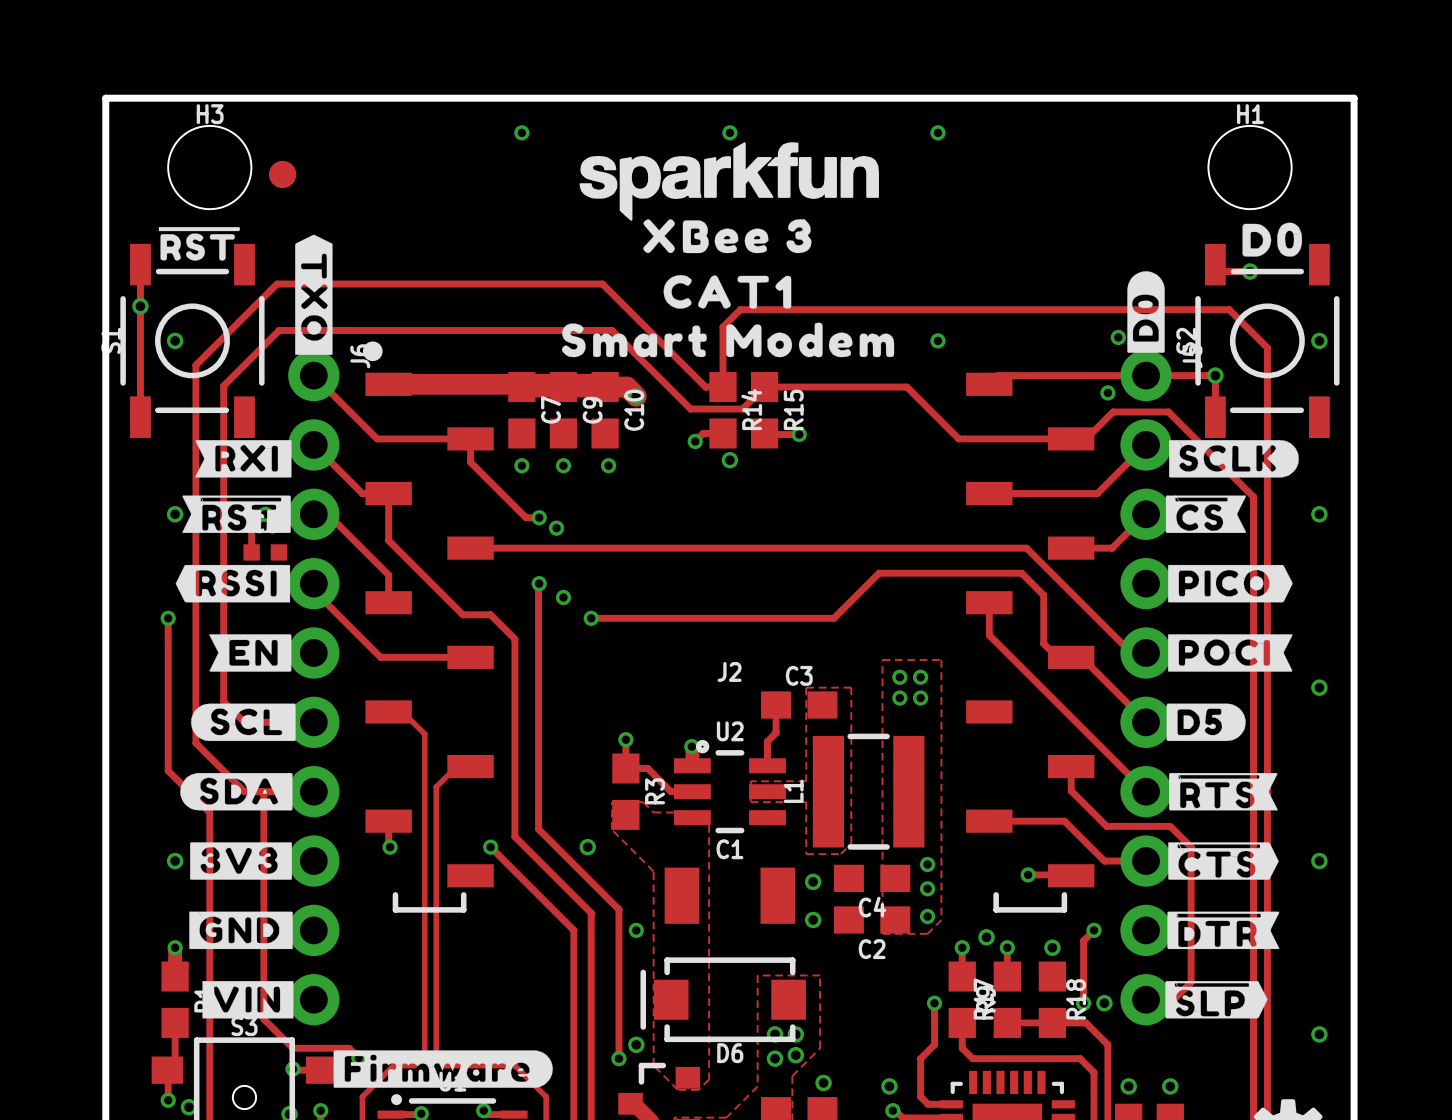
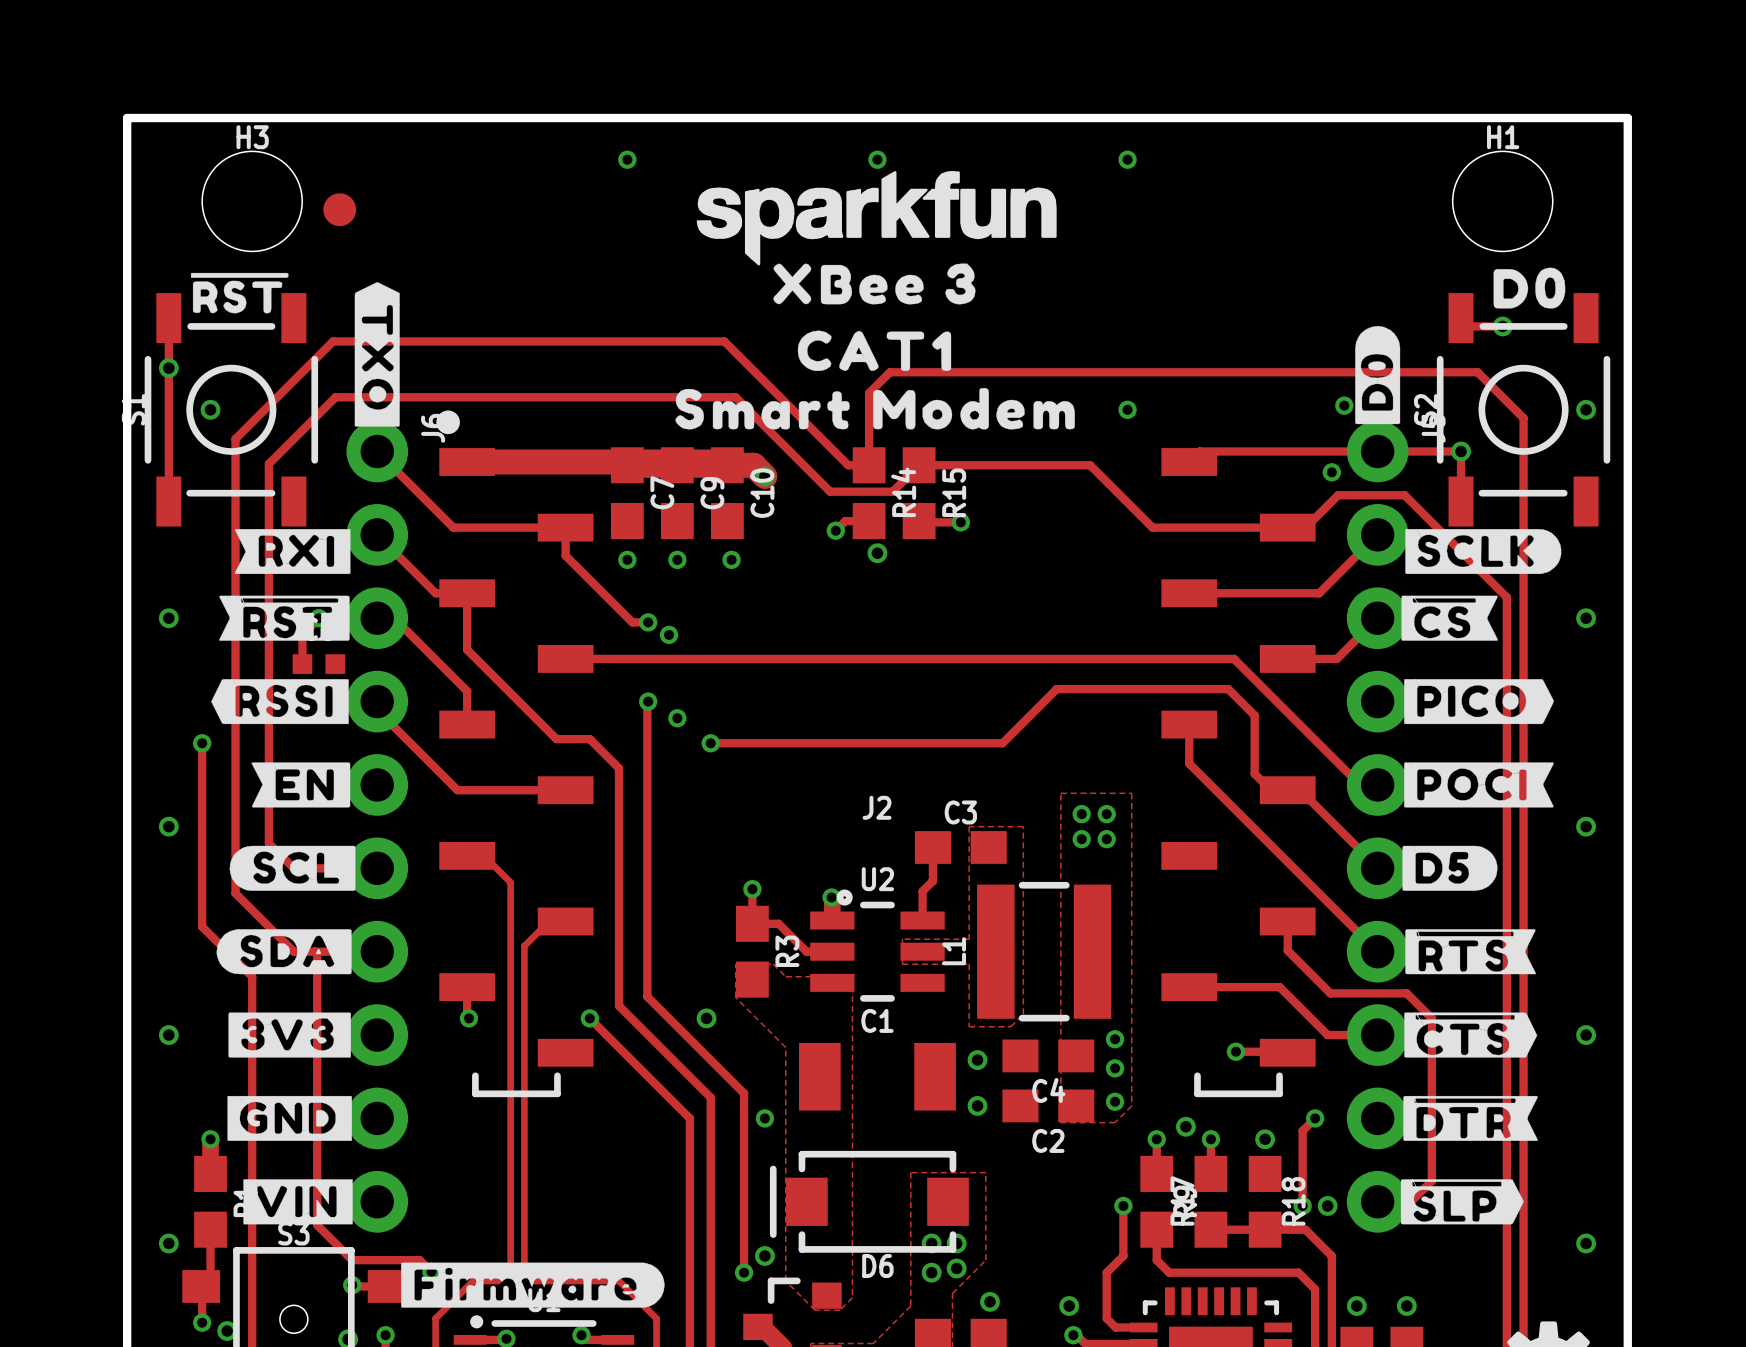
via position: (175, 514) -> (168, 618)
via: none -> (168, 826)
via position: (175, 861) -> (168, 1035)
via: none -> (168, 1243)

